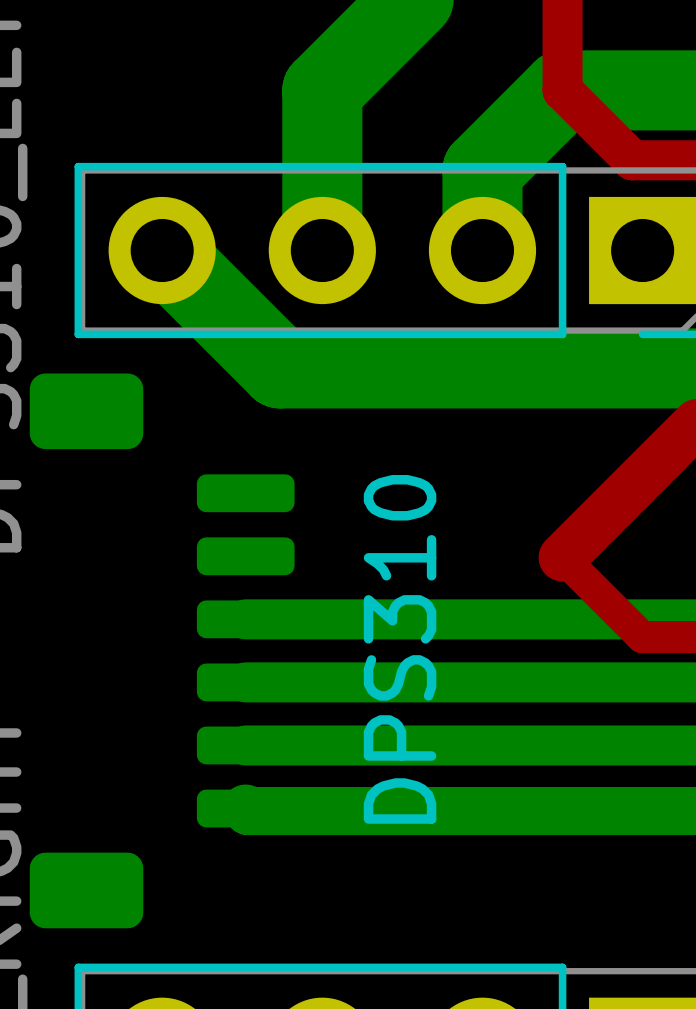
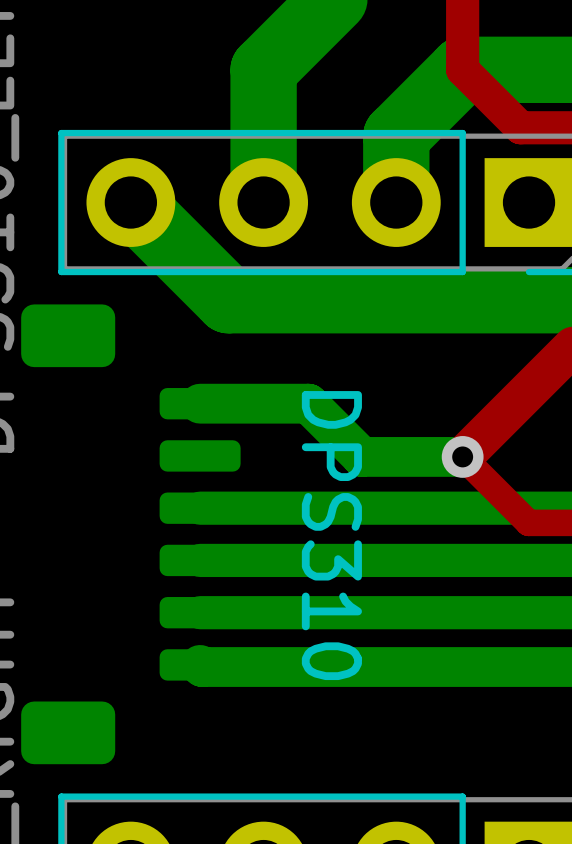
bottom track: none -> (200, 403) (308, 403) (361, 456) (462, 456)
via: none -> (462, 456)
text rotation: 0° (400, 649) -> 180° (331, 535)

